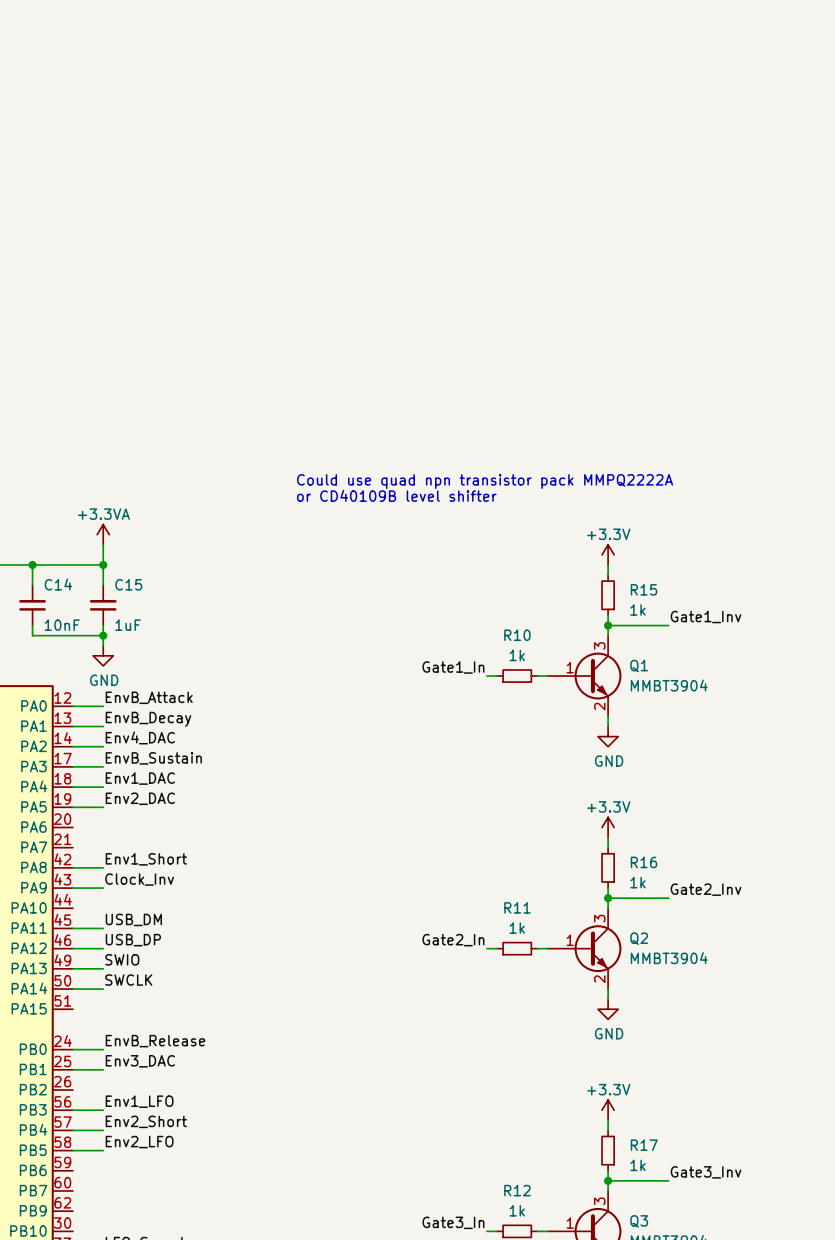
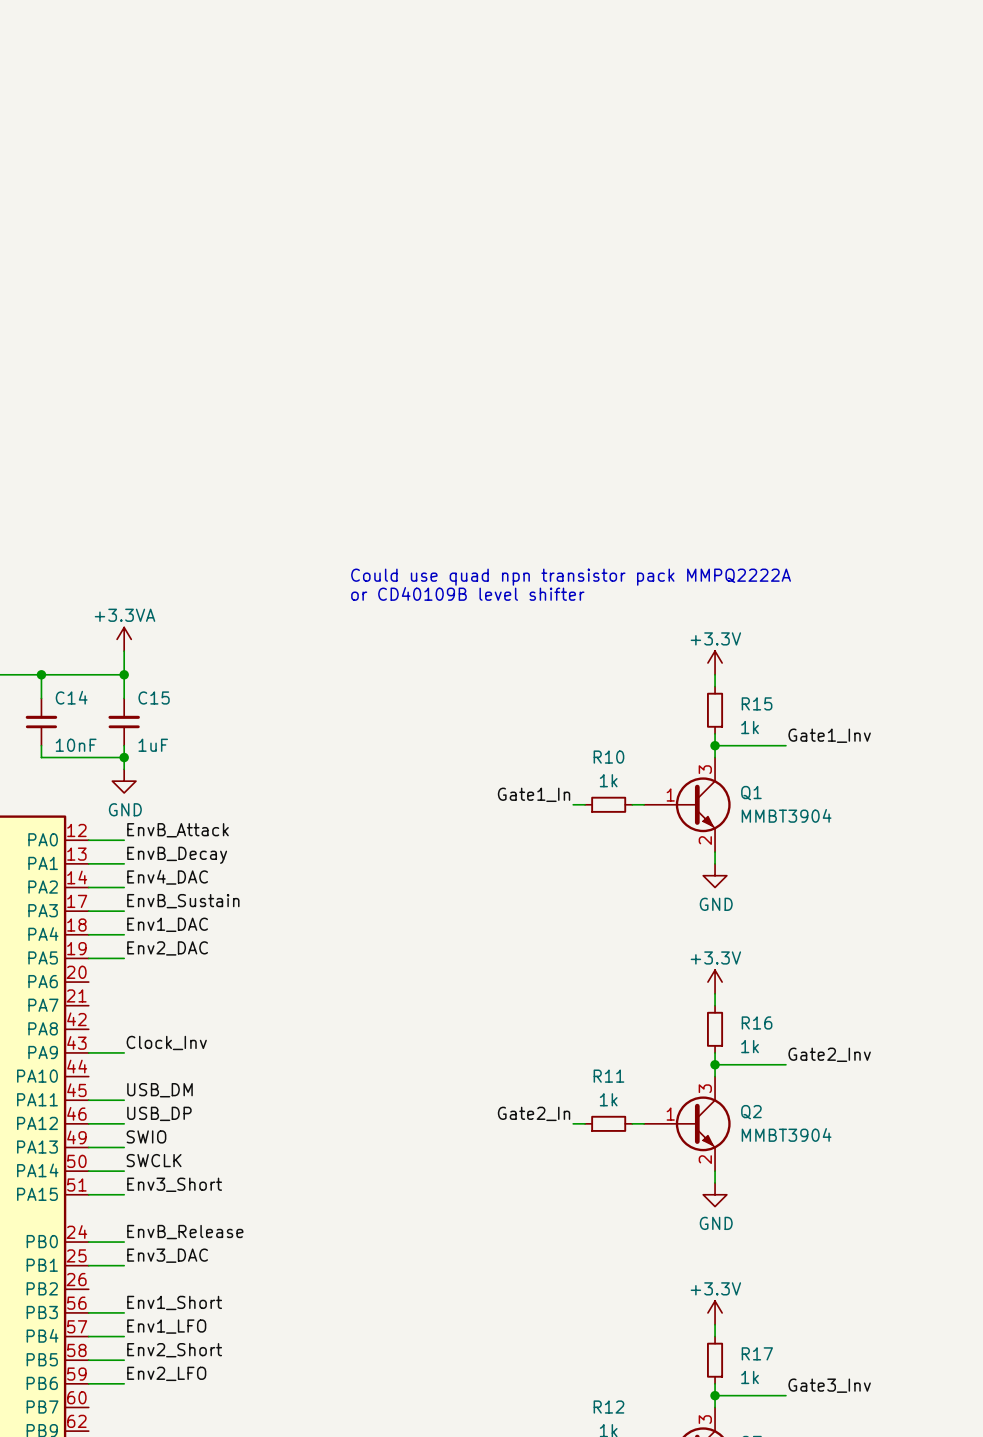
label: Env1_Short (146, 859) -> none
wire: (72, 867) (103, 867) -> (88, 1194) (124, 1194)
label: none -> Env3_Short (174, 1184)
label: Env1_LFO (139, 1101) -> Env1_Short (174, 1302)
label: Env2_Short (146, 1121) -> Env1_LFO (166, 1326)
label: Env2_LFO (139, 1142) -> Env2_Short (174, 1350)
label: none -> Env2_LFO (166, 1373)
wire: none -> (88, 1383) (124, 1383)

